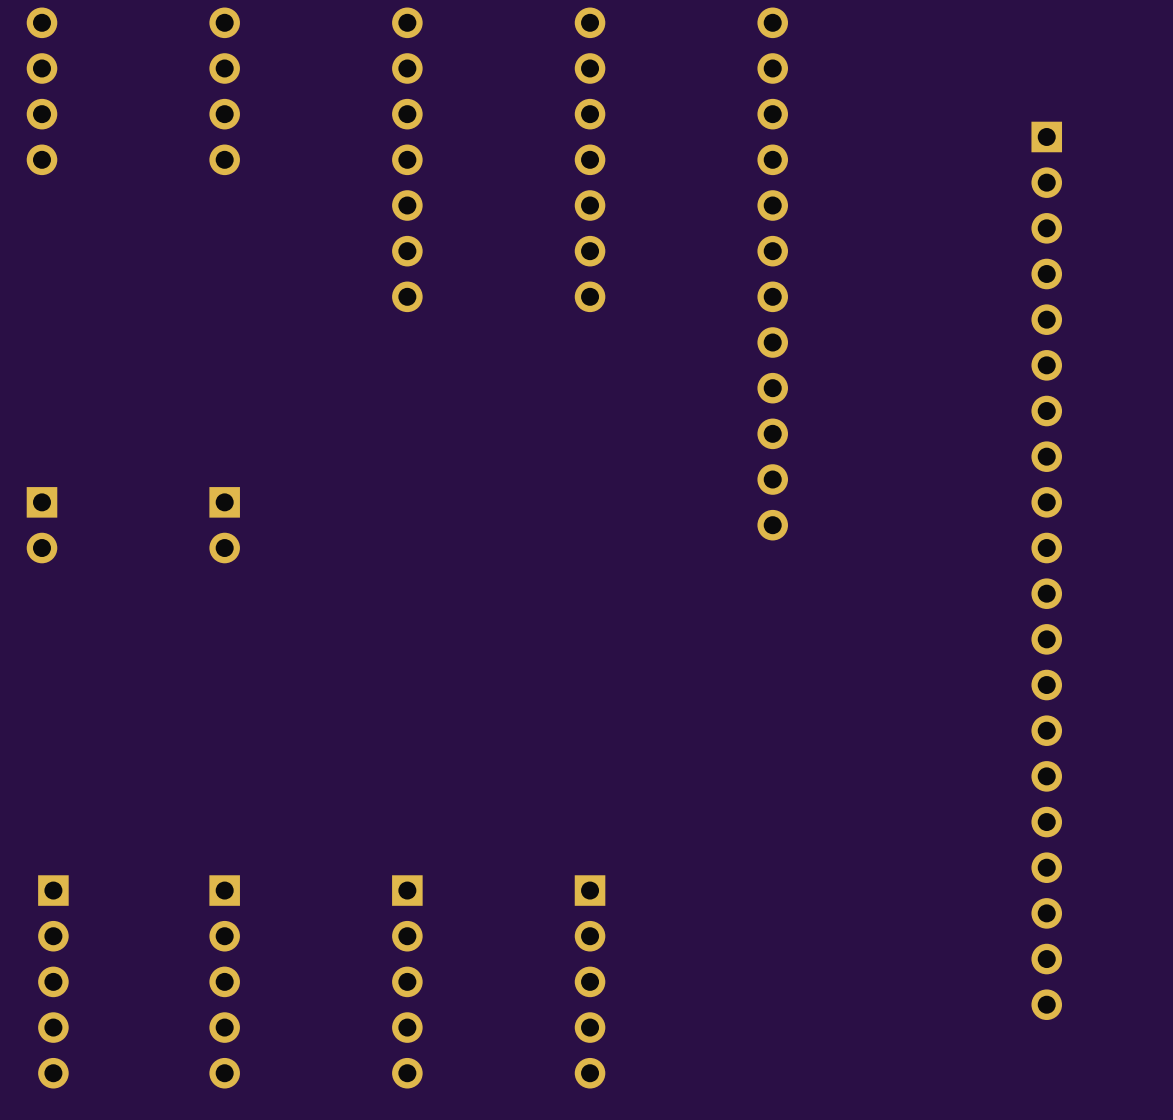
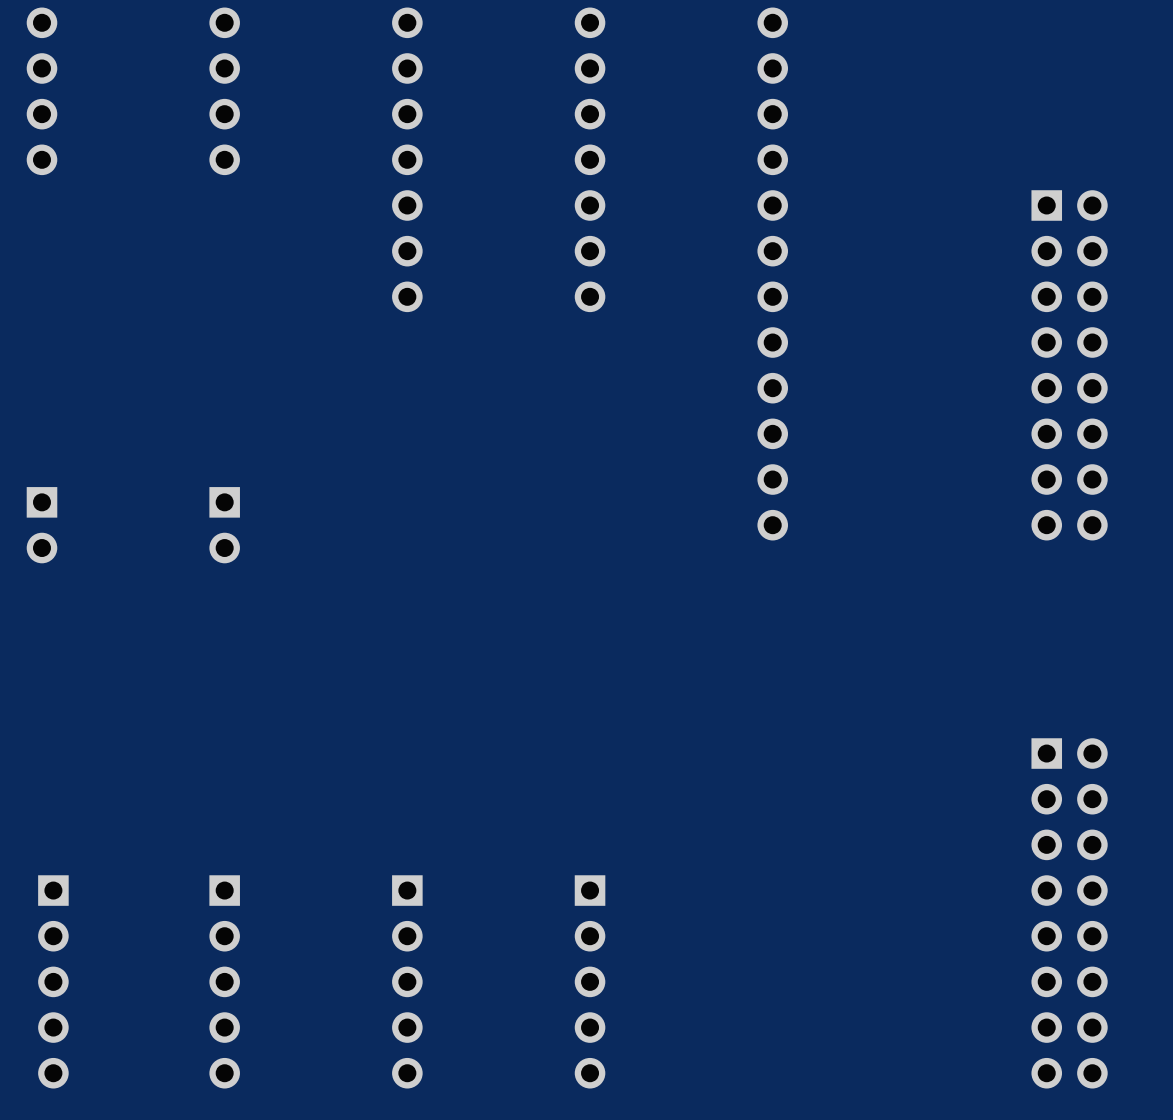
part: none -> (1069, 365)
part: (1046, 570) -> none
part: none -> (1069, 913)

